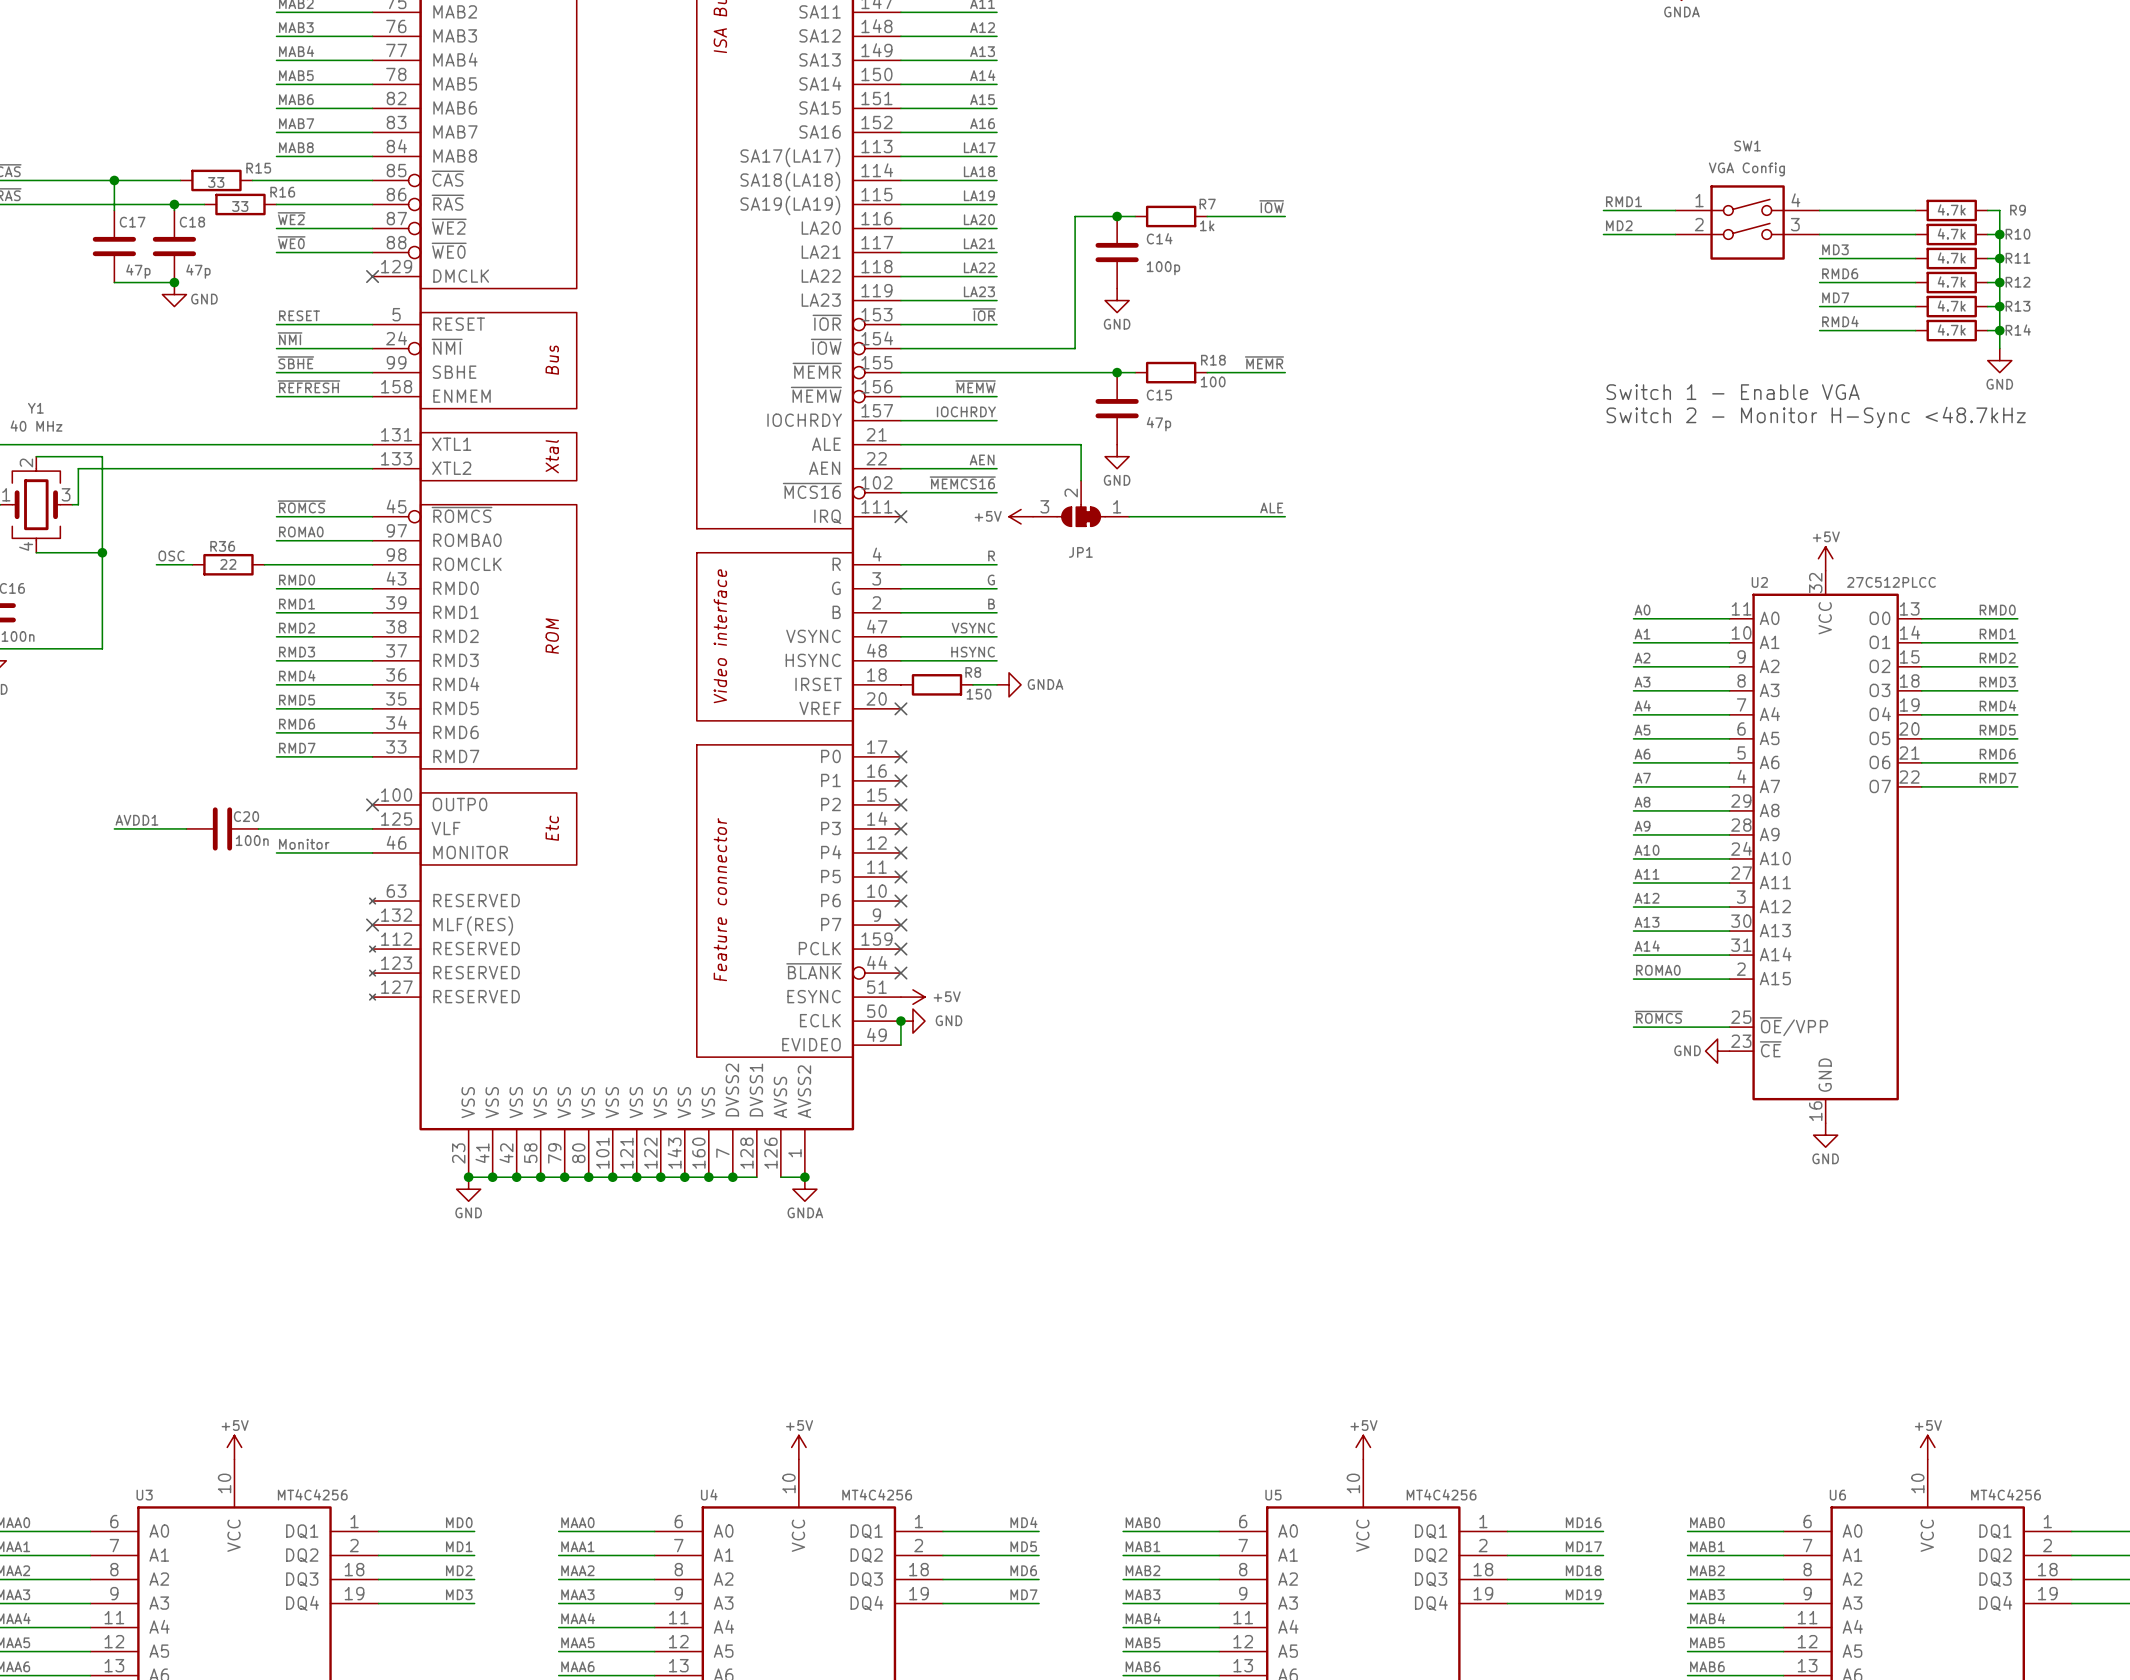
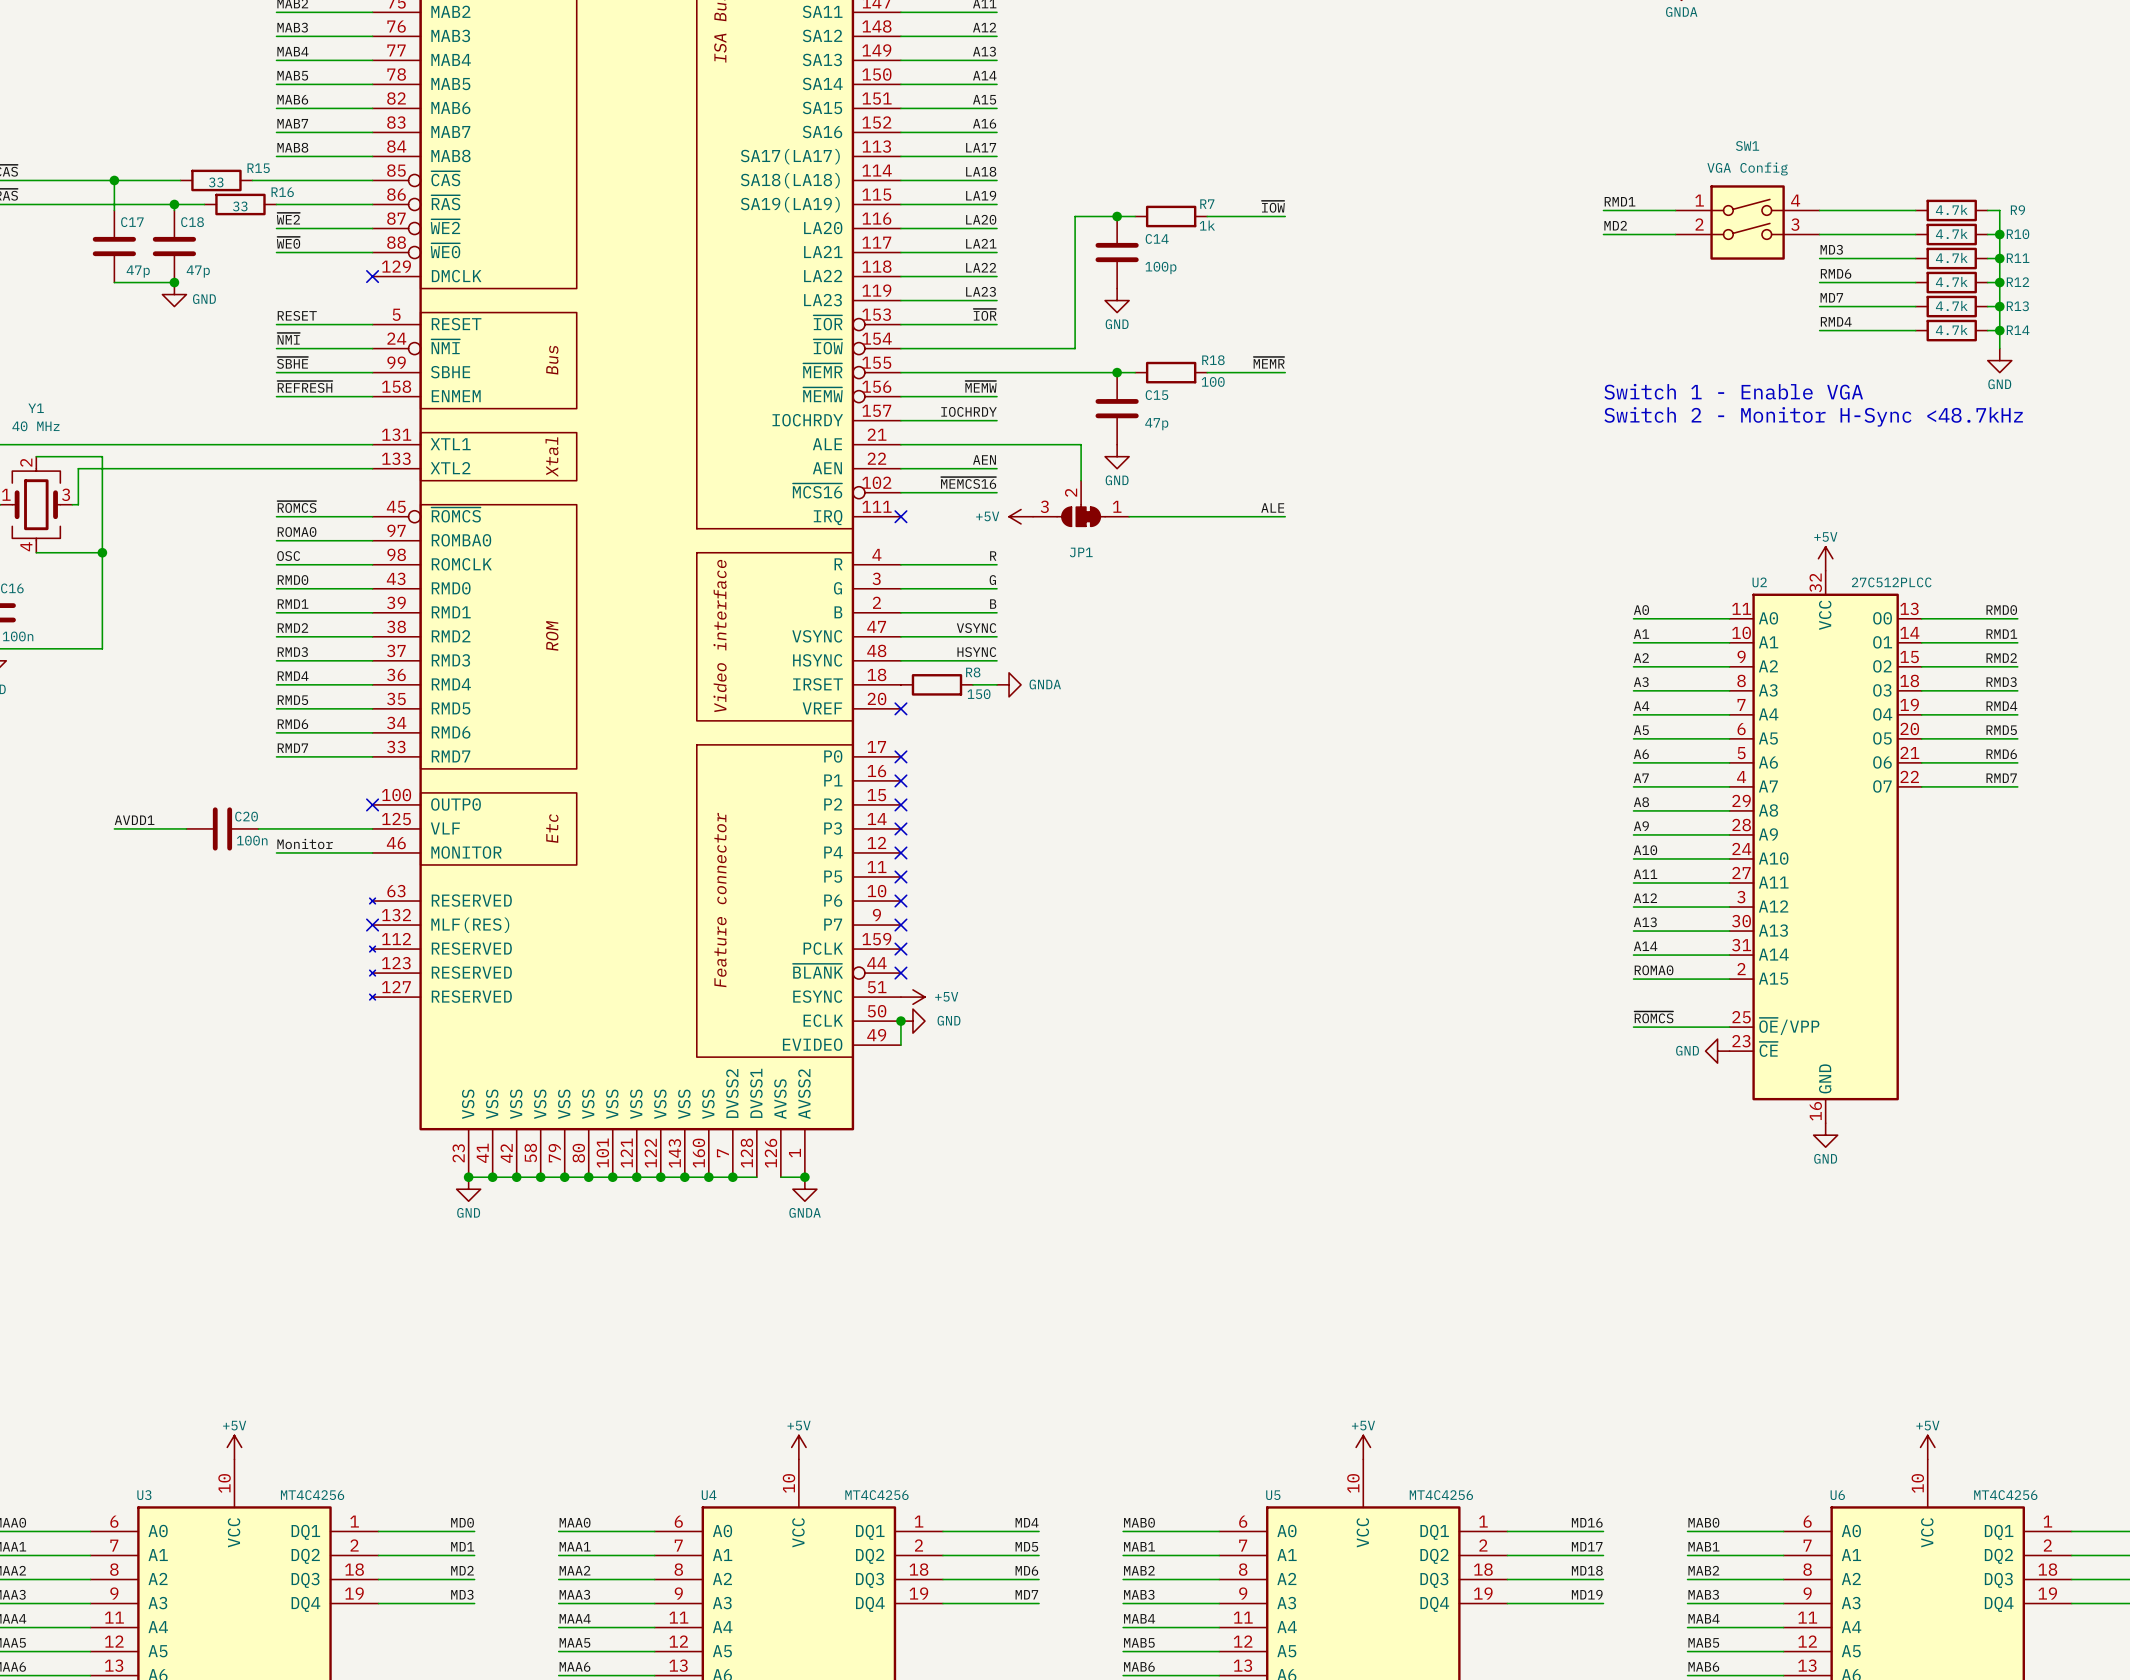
label position: OSC (171, 556) -> OSC (288, 556)
wire: (156, 564) (192, 564) -> none
R36: 22 (228, 564) -> none
wire: (264, 564) (276, 564) -> none

